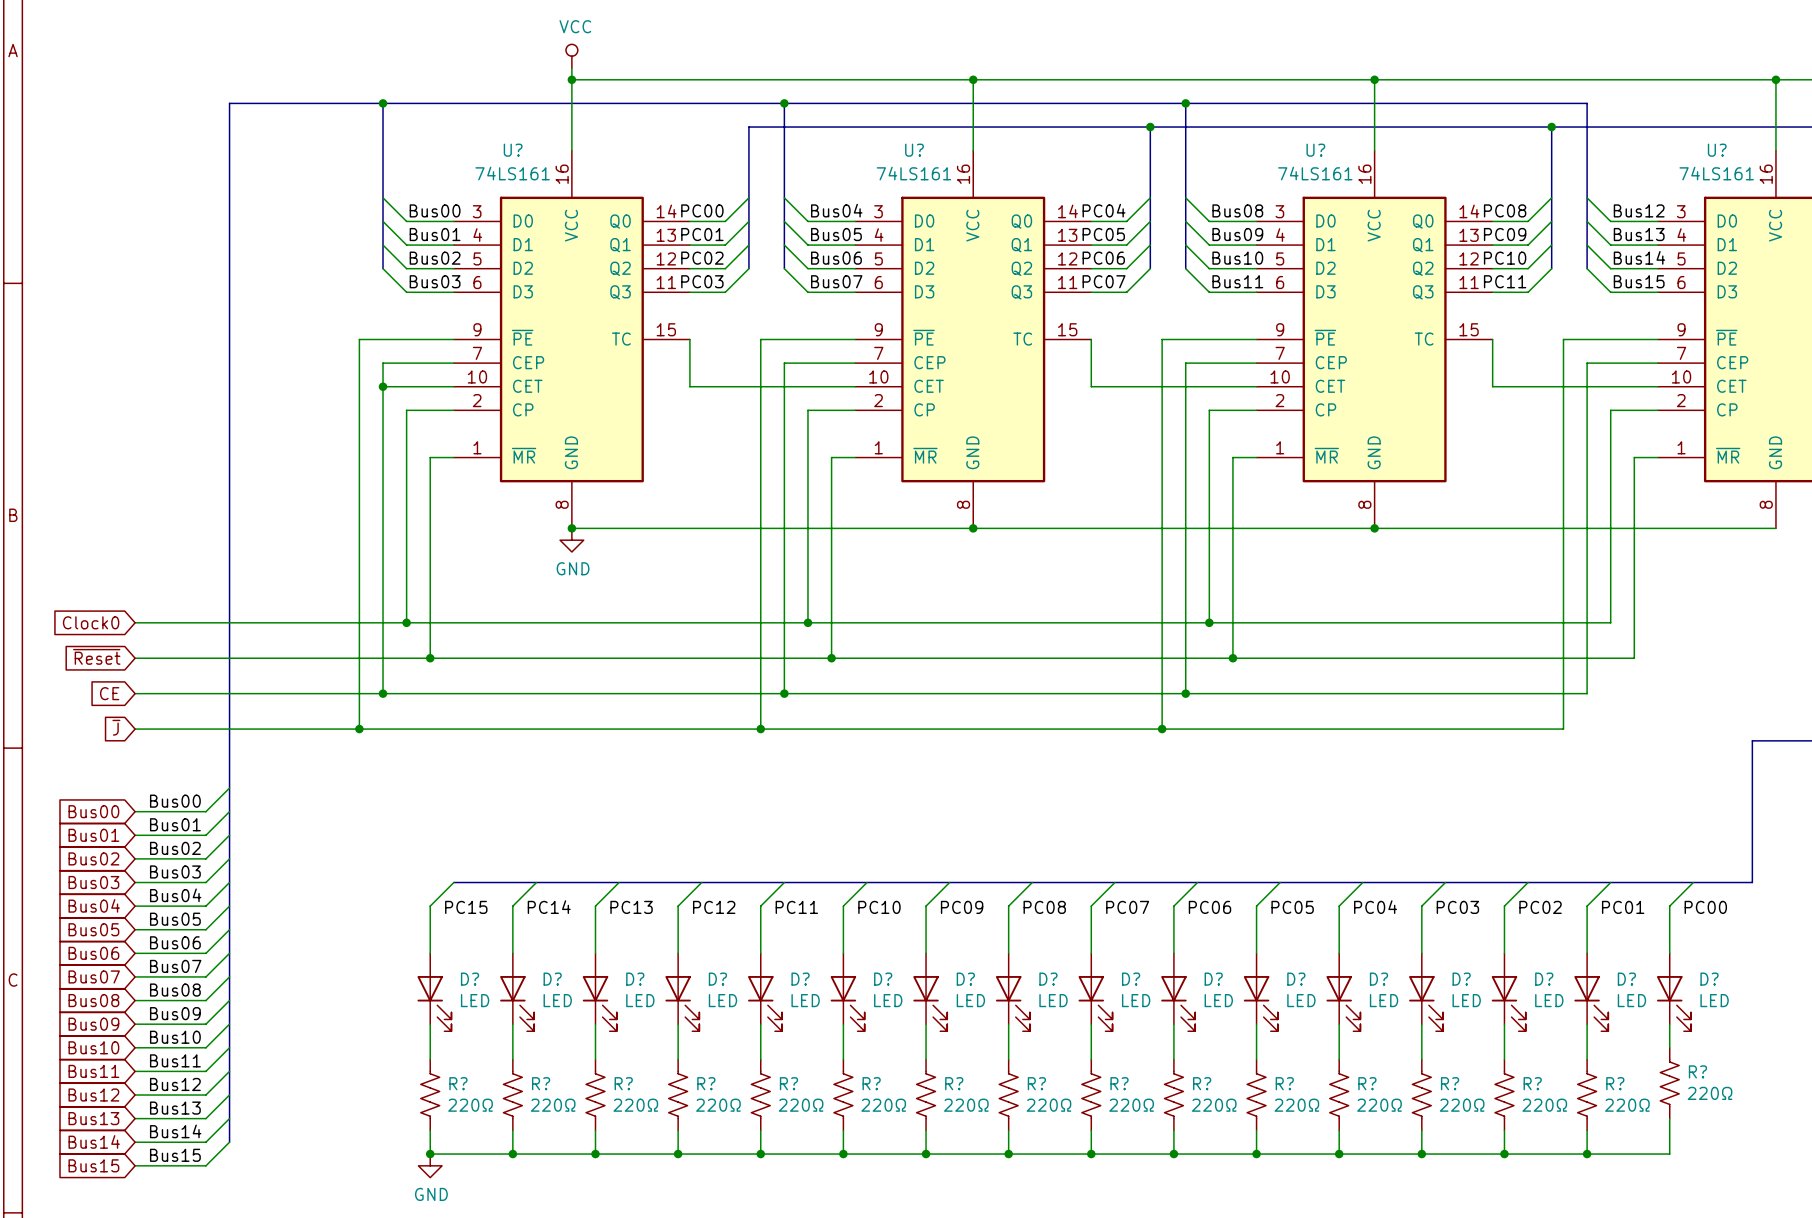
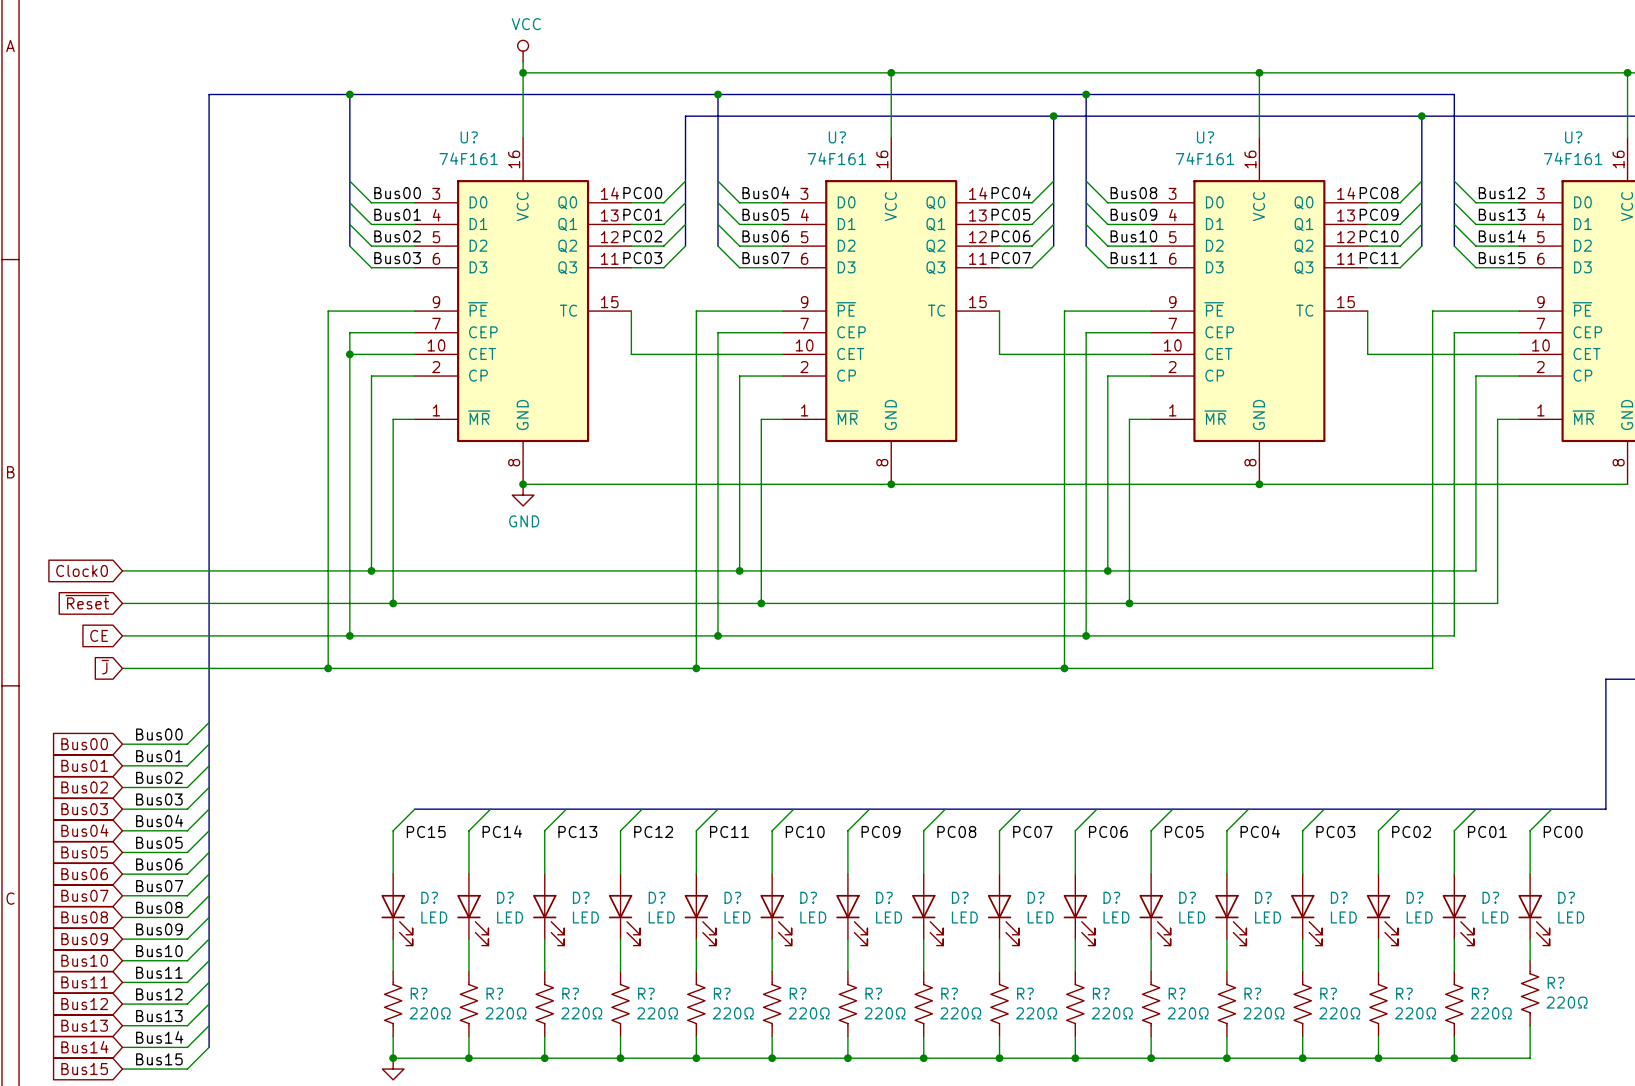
U? value: 74LS161 (512, 173) -> 74F161 (468, 158)
U? value: 74LS161 (913, 173) -> 74F161 (836, 158)
U? value: 74LS161 (1315, 173) -> 74F161 (1205, 158)
U? value: 74LS161 (1716, 173) -> 74F161 (1573, 158)

